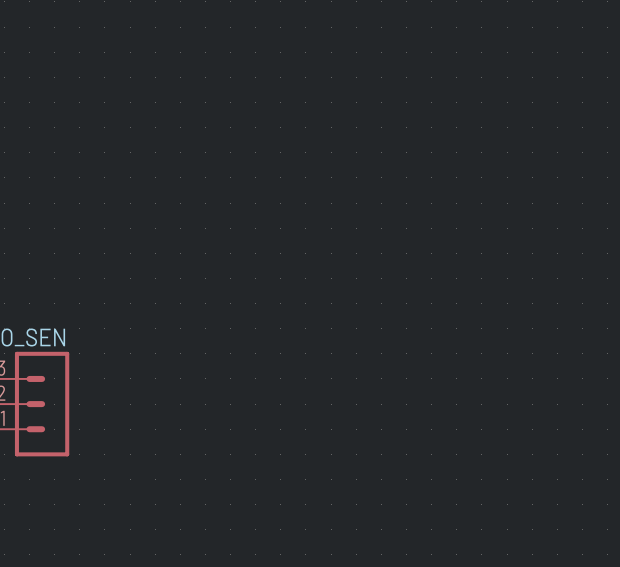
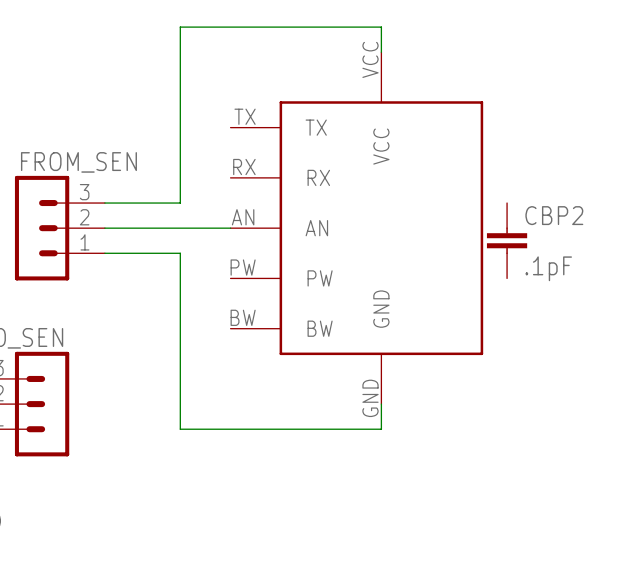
wire: none -> (381, 52) (381, 27) (180, 27) (180, 203) (104, 203)
FROM_SEN: none -> (59, 228)
wire: none -> (104, 228) (230, 228)
part: none -> (356, 228)
CBP2: none -> .1pF (507, 240)
wire: none -> (104, 253) (180, 253) (180, 429) (381, 429) (381, 404)

